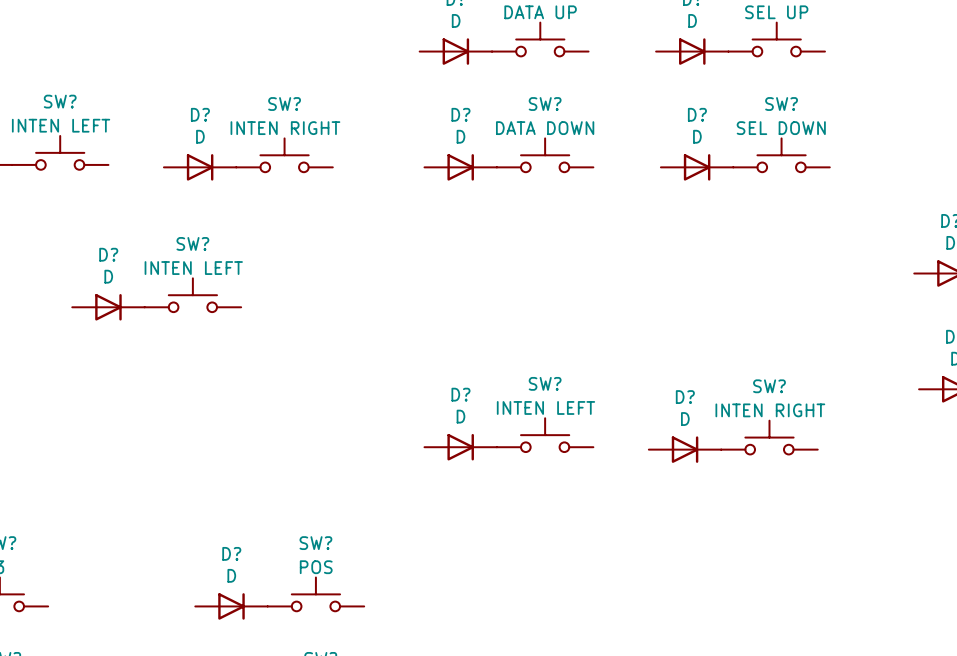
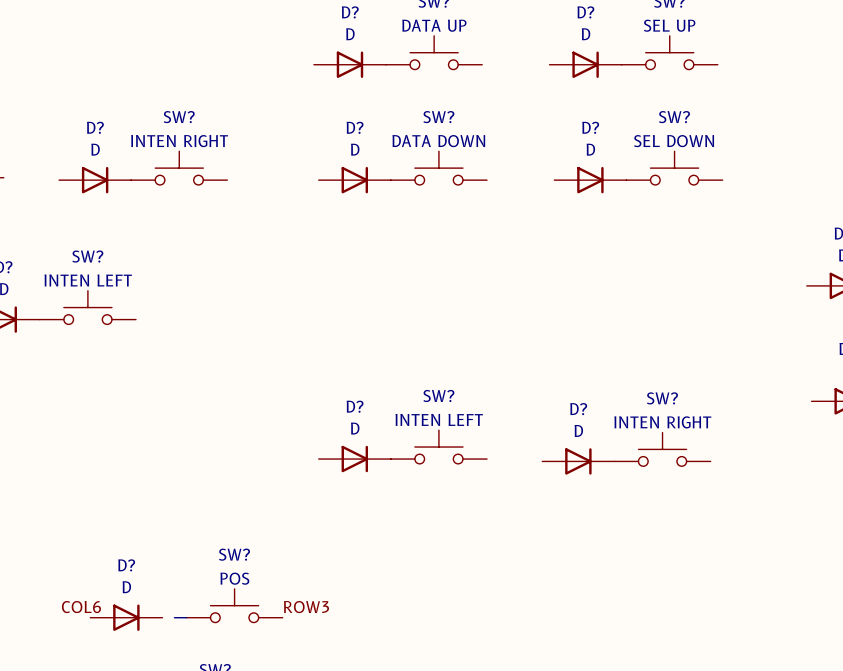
SW? position: (315, 594) -> (234, 605)
label: none -> COL6 (81, 607)
label: none -> ROW3 (306, 607)

